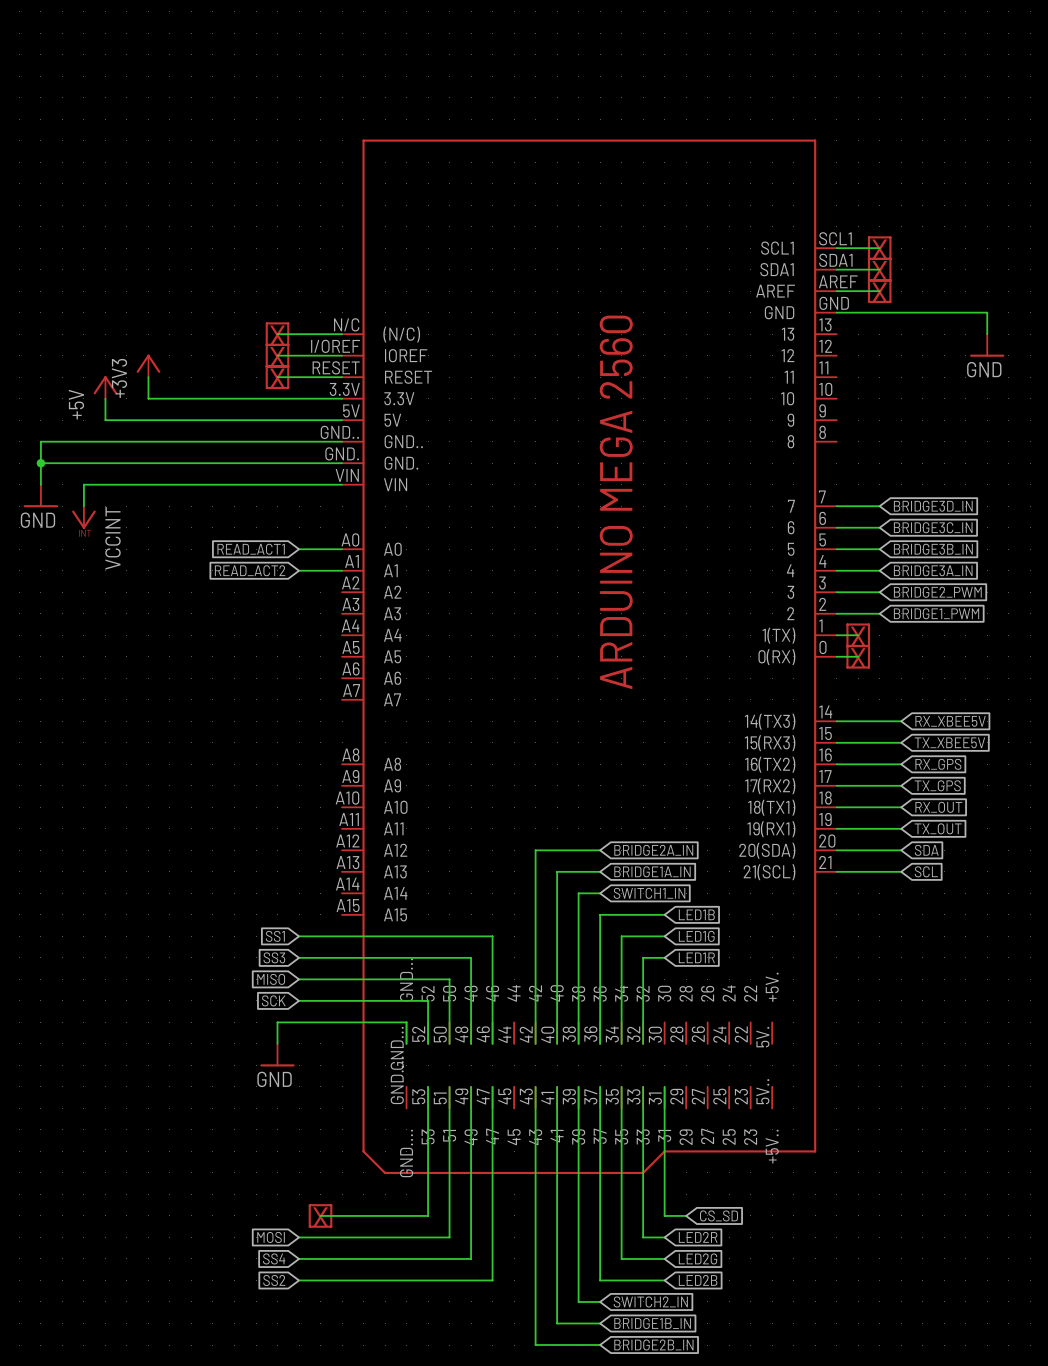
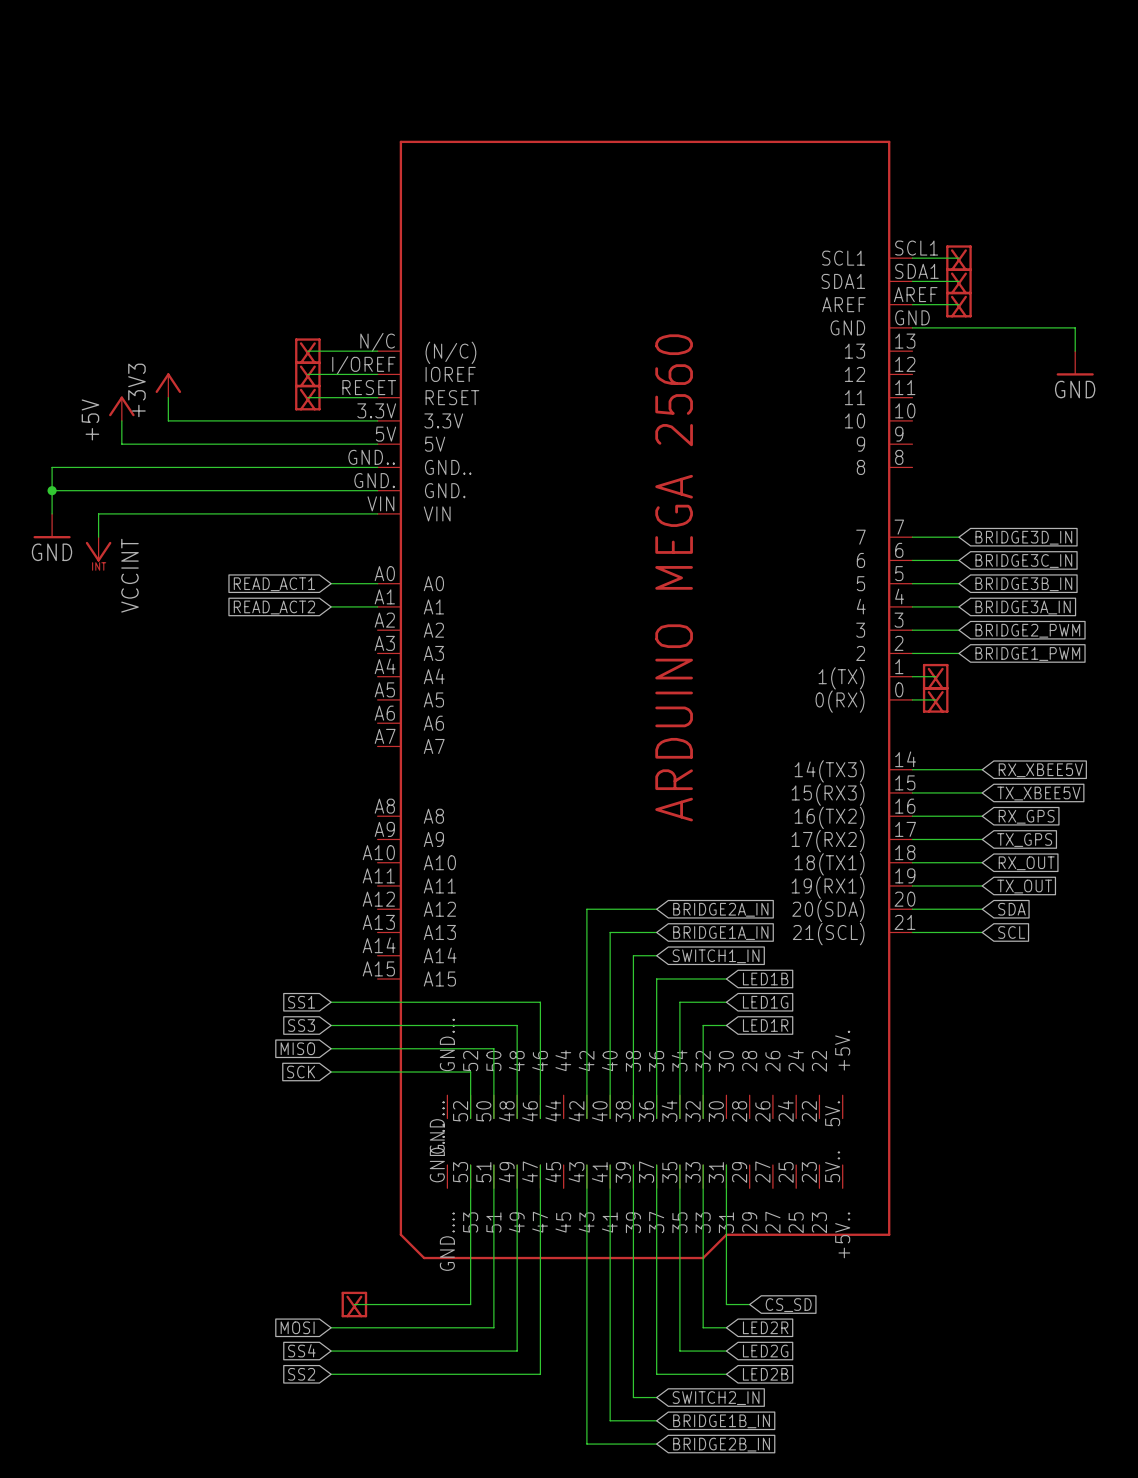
wire: (277, 1043) (277, 1022) (406, 1022) (406, 1043) -> none
power symbol: GND (277, 1055) -> none

